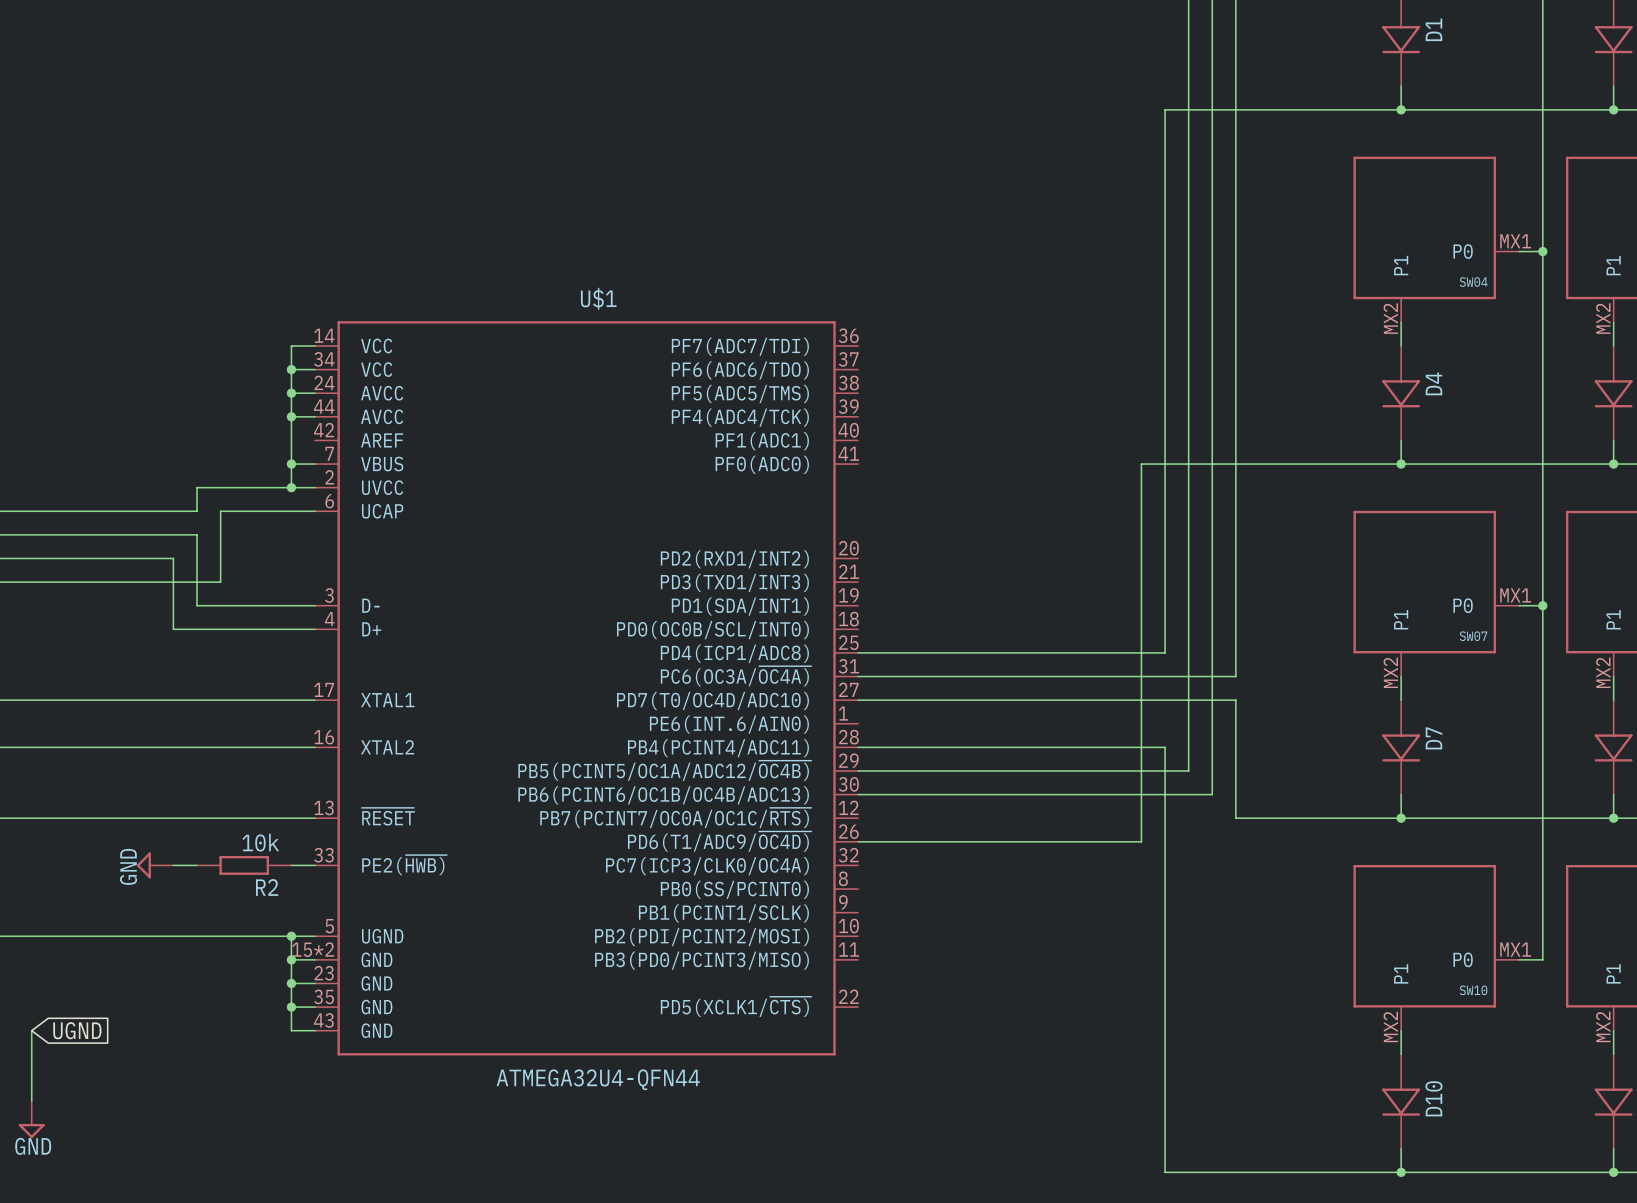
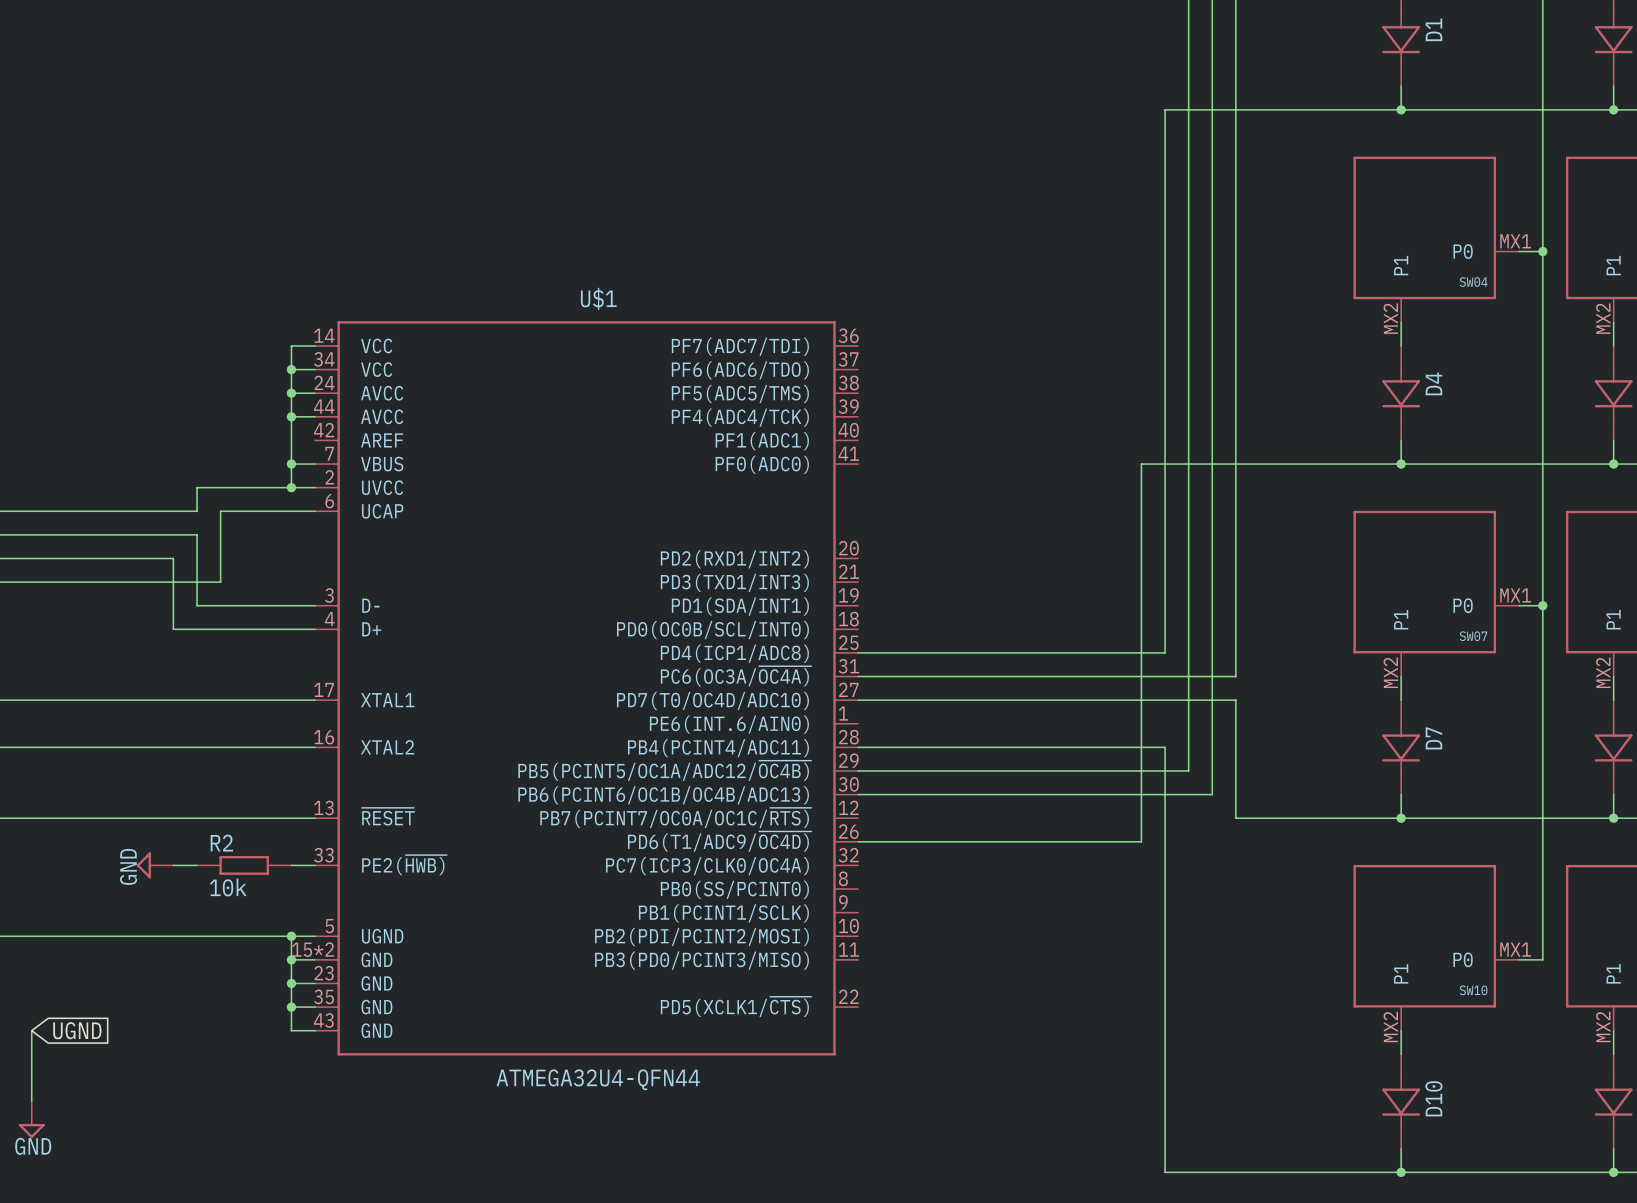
R2 value position: 10k (260, 842) -> 10k (228, 887)
R2 name position: R2 (267, 887) -> R2 (221, 843)

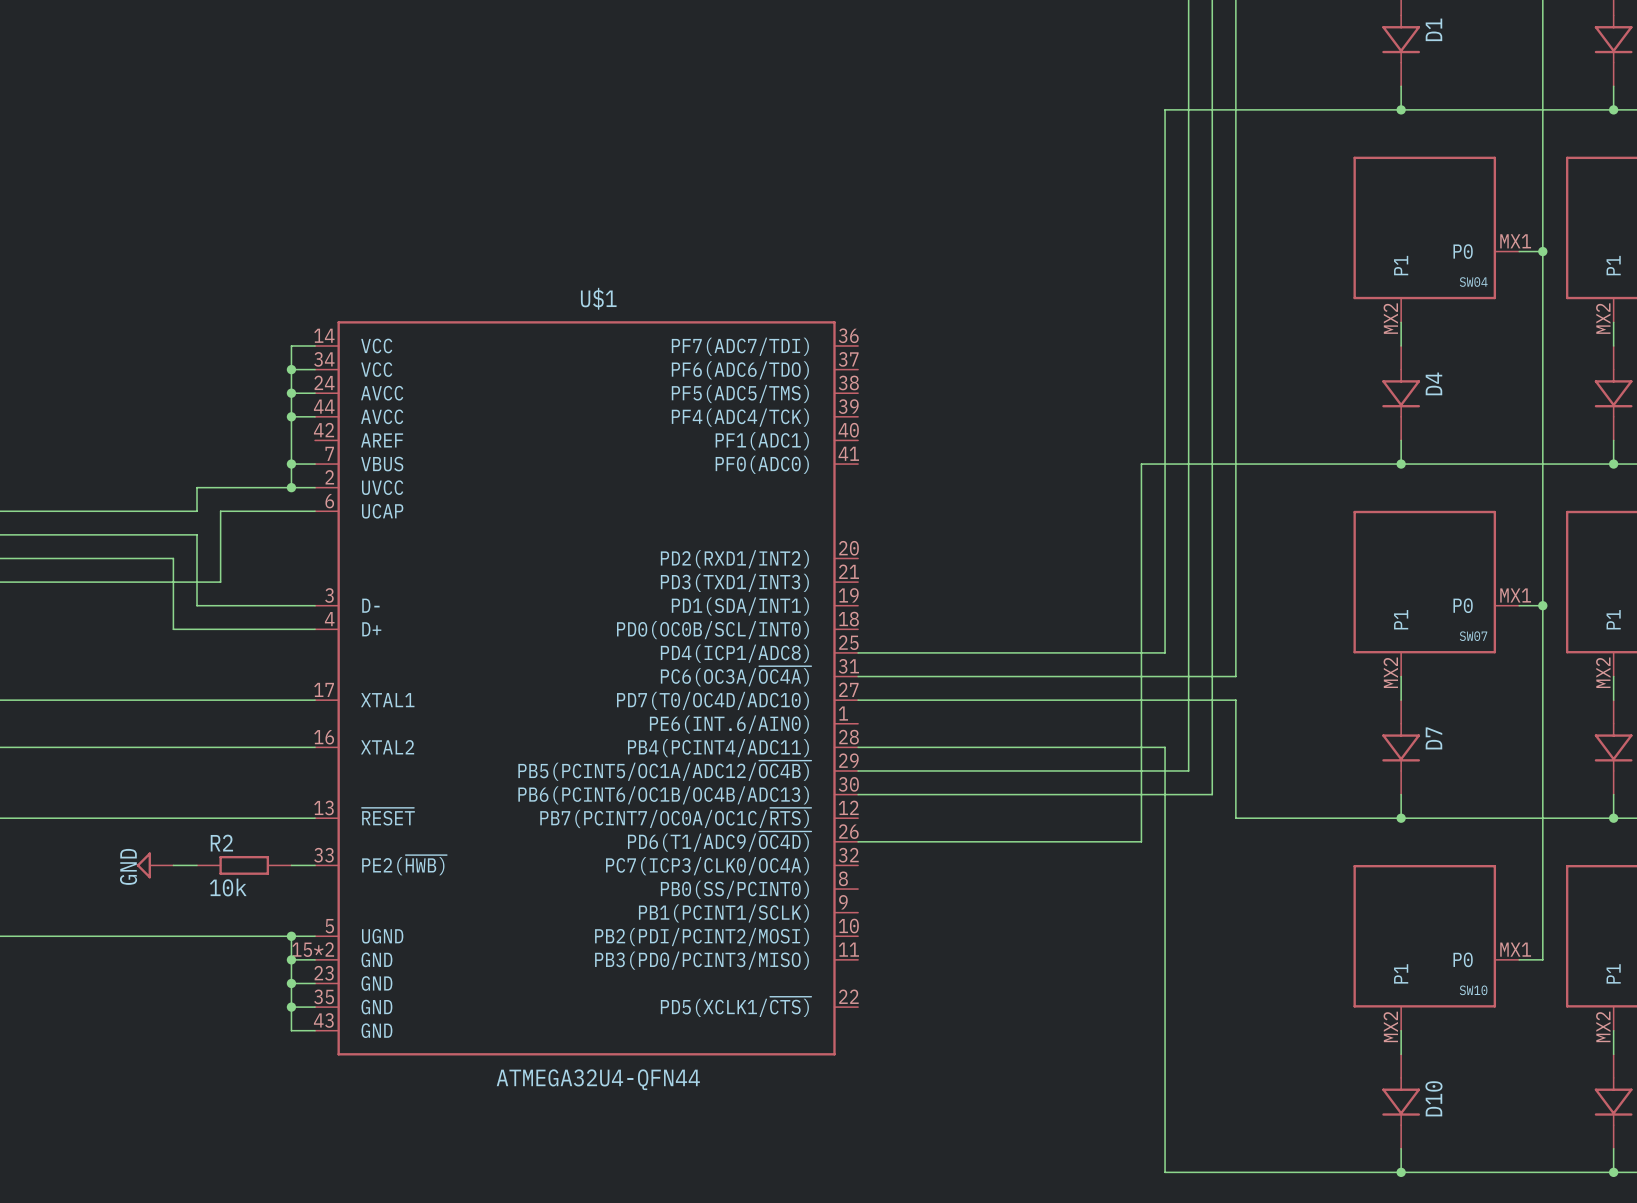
wire: (31, 1030) (31, 1101) -> none
global label: UGND (77, 1030) -> none
power symbol: GND (31, 1119) -> none

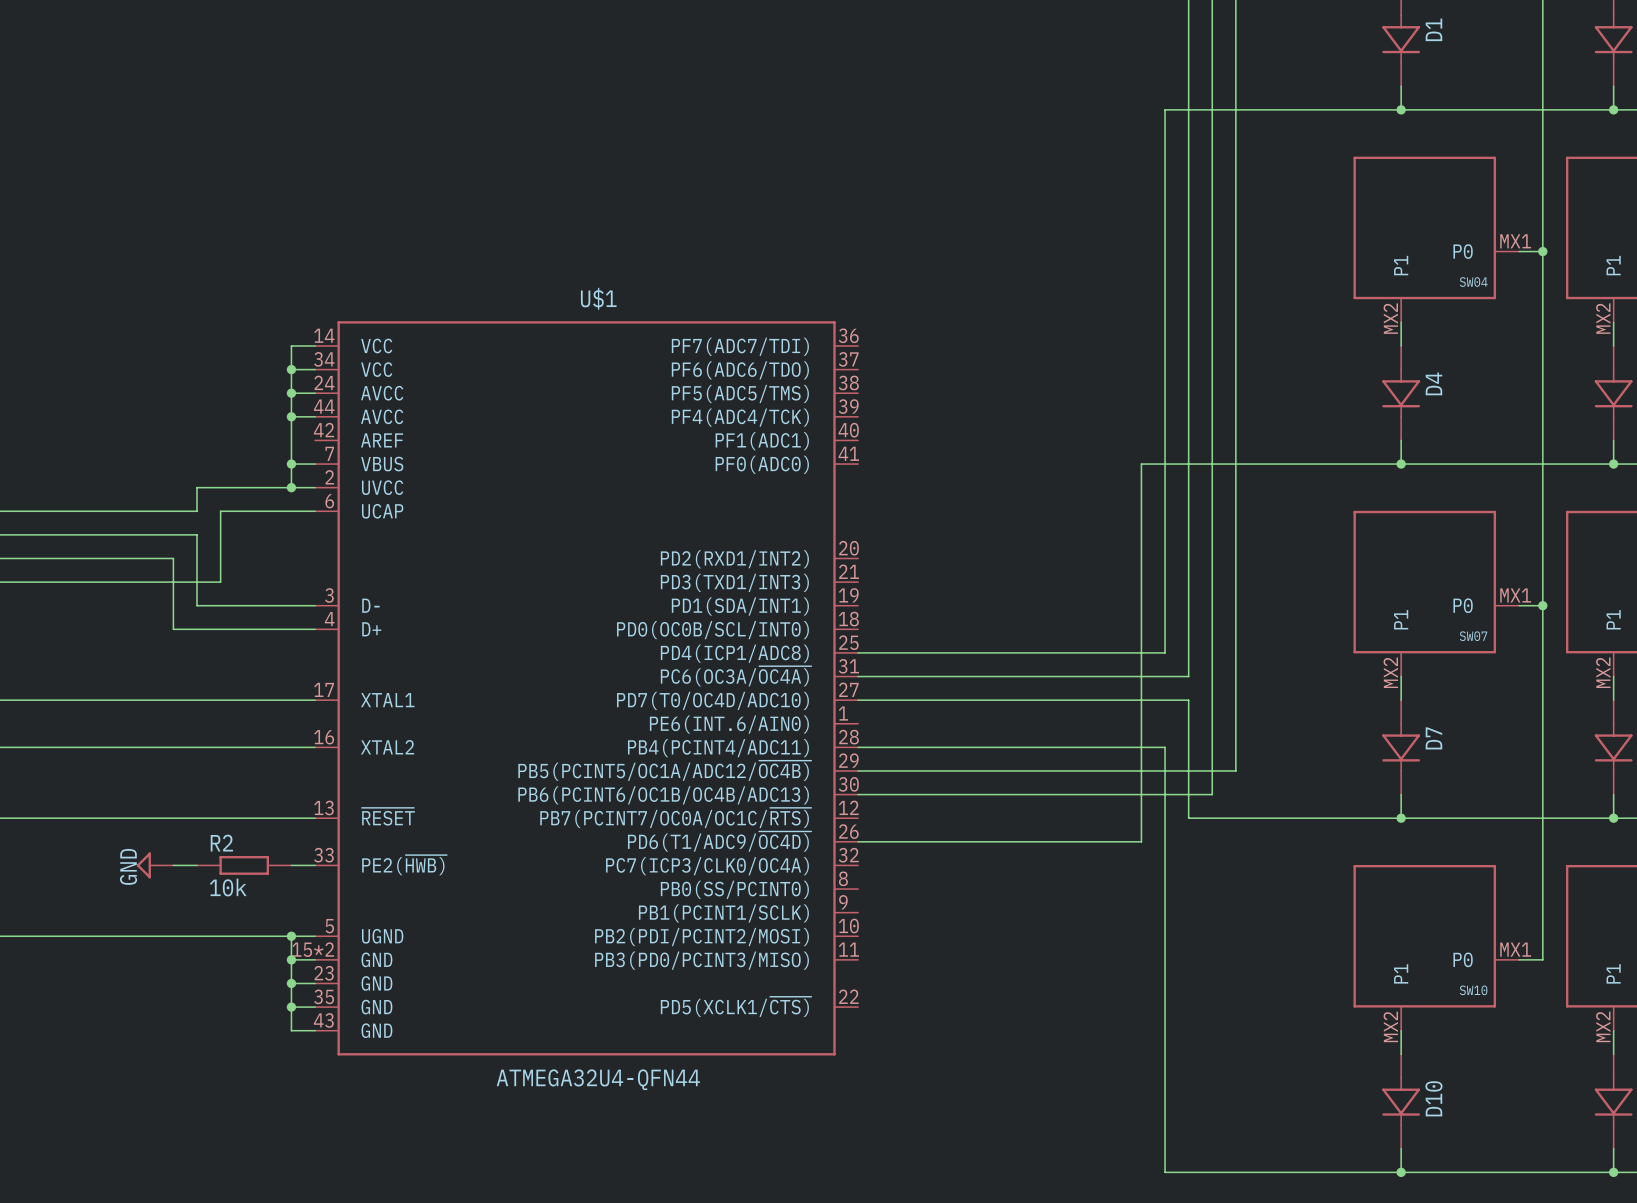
wire: (1235, 676) (1188, 676) (1188, 700) (1235, 700) -> (1235, 676) (1235, 700)
wire: (1235, 770) (1235, 818) -> (1235, 770) (1188, 770) (1188, 818) (1235, 818)

